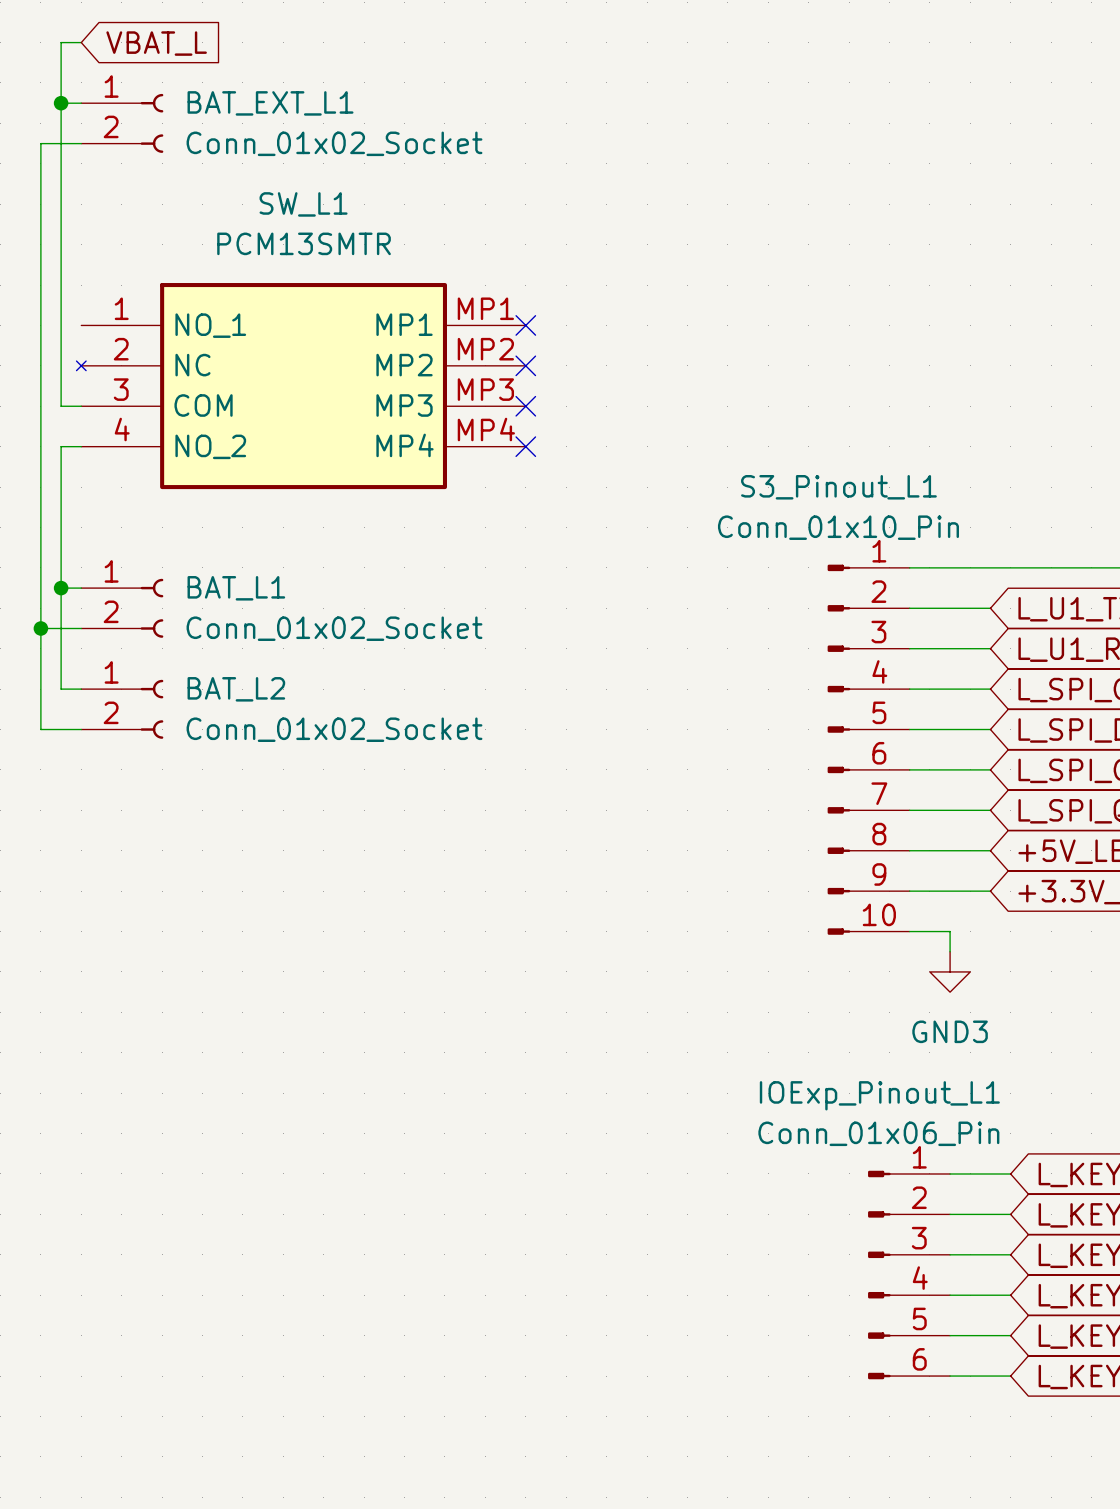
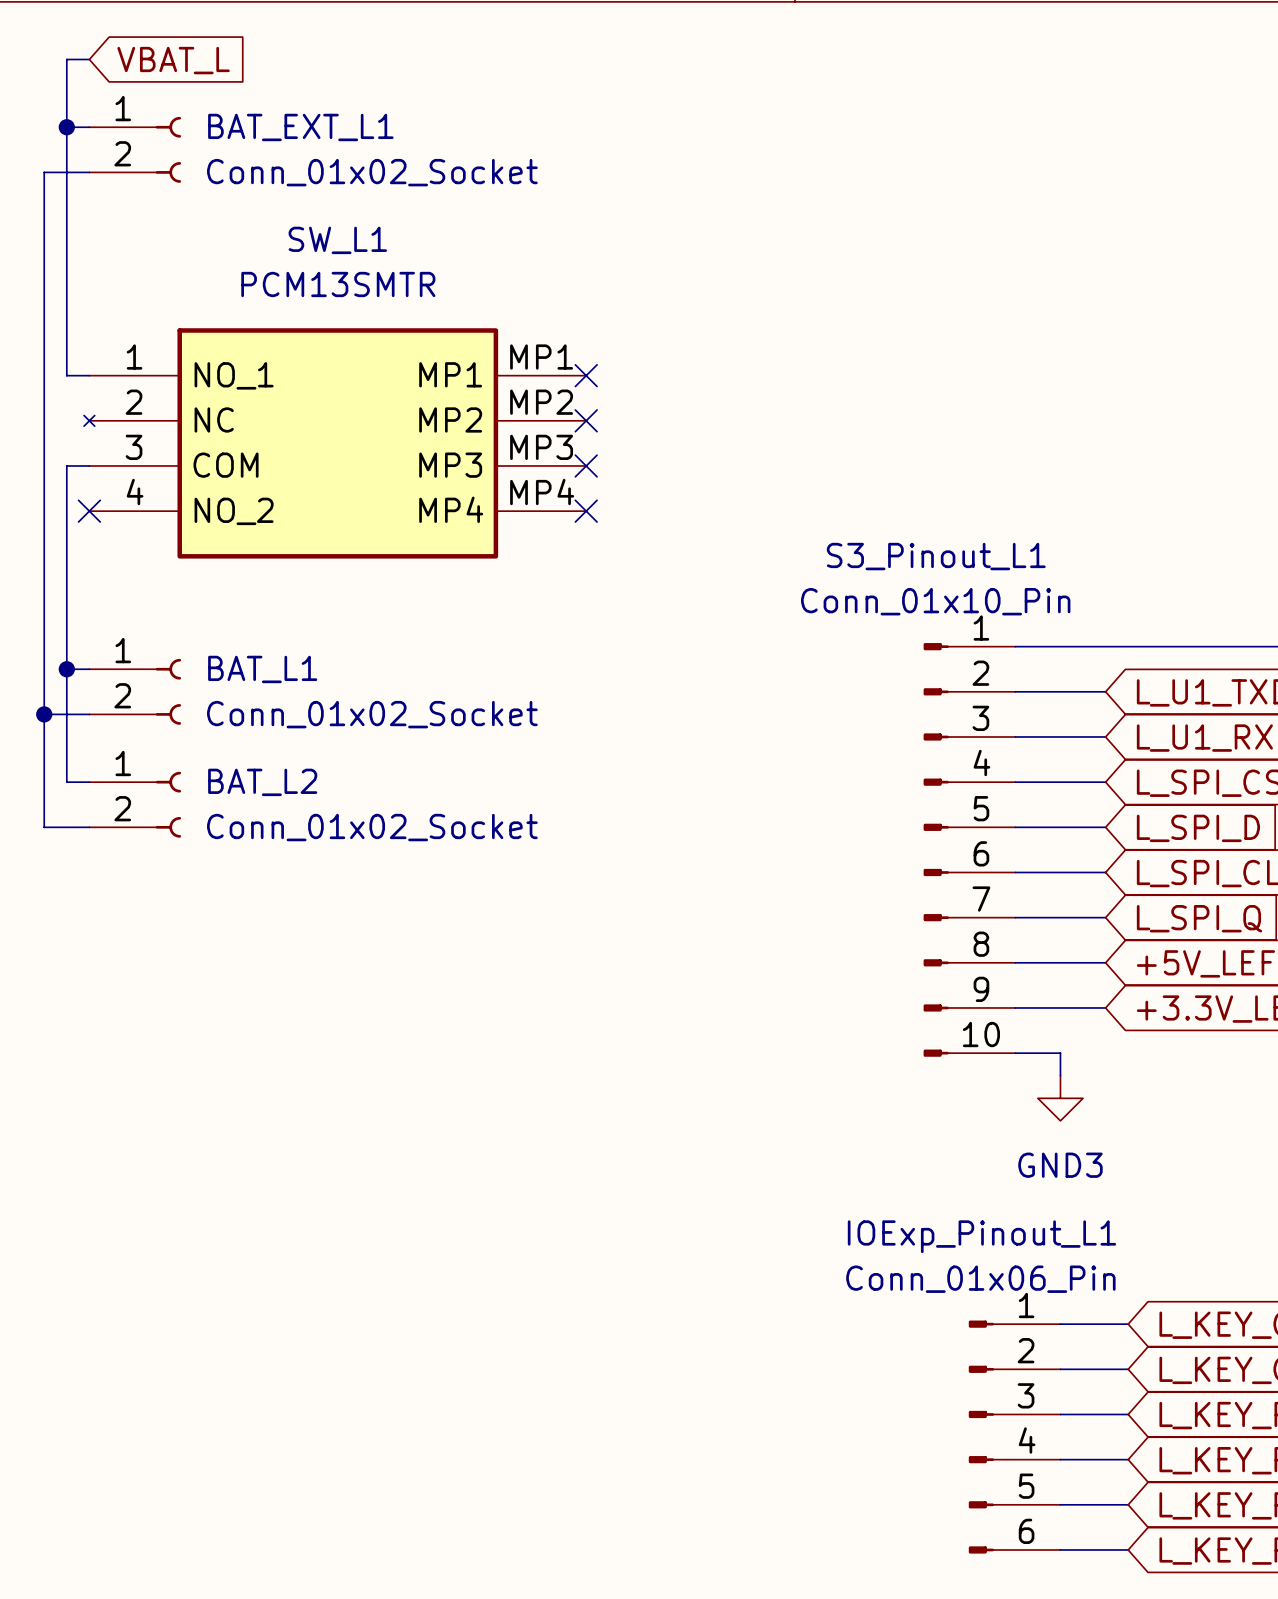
wire: (61, 325) (61, 406) -> (66, 375) (89, 375)
wire: (61, 446) (81, 446) -> (66, 511) (66, 465)
no-connect mark: none -> (89, 511)

